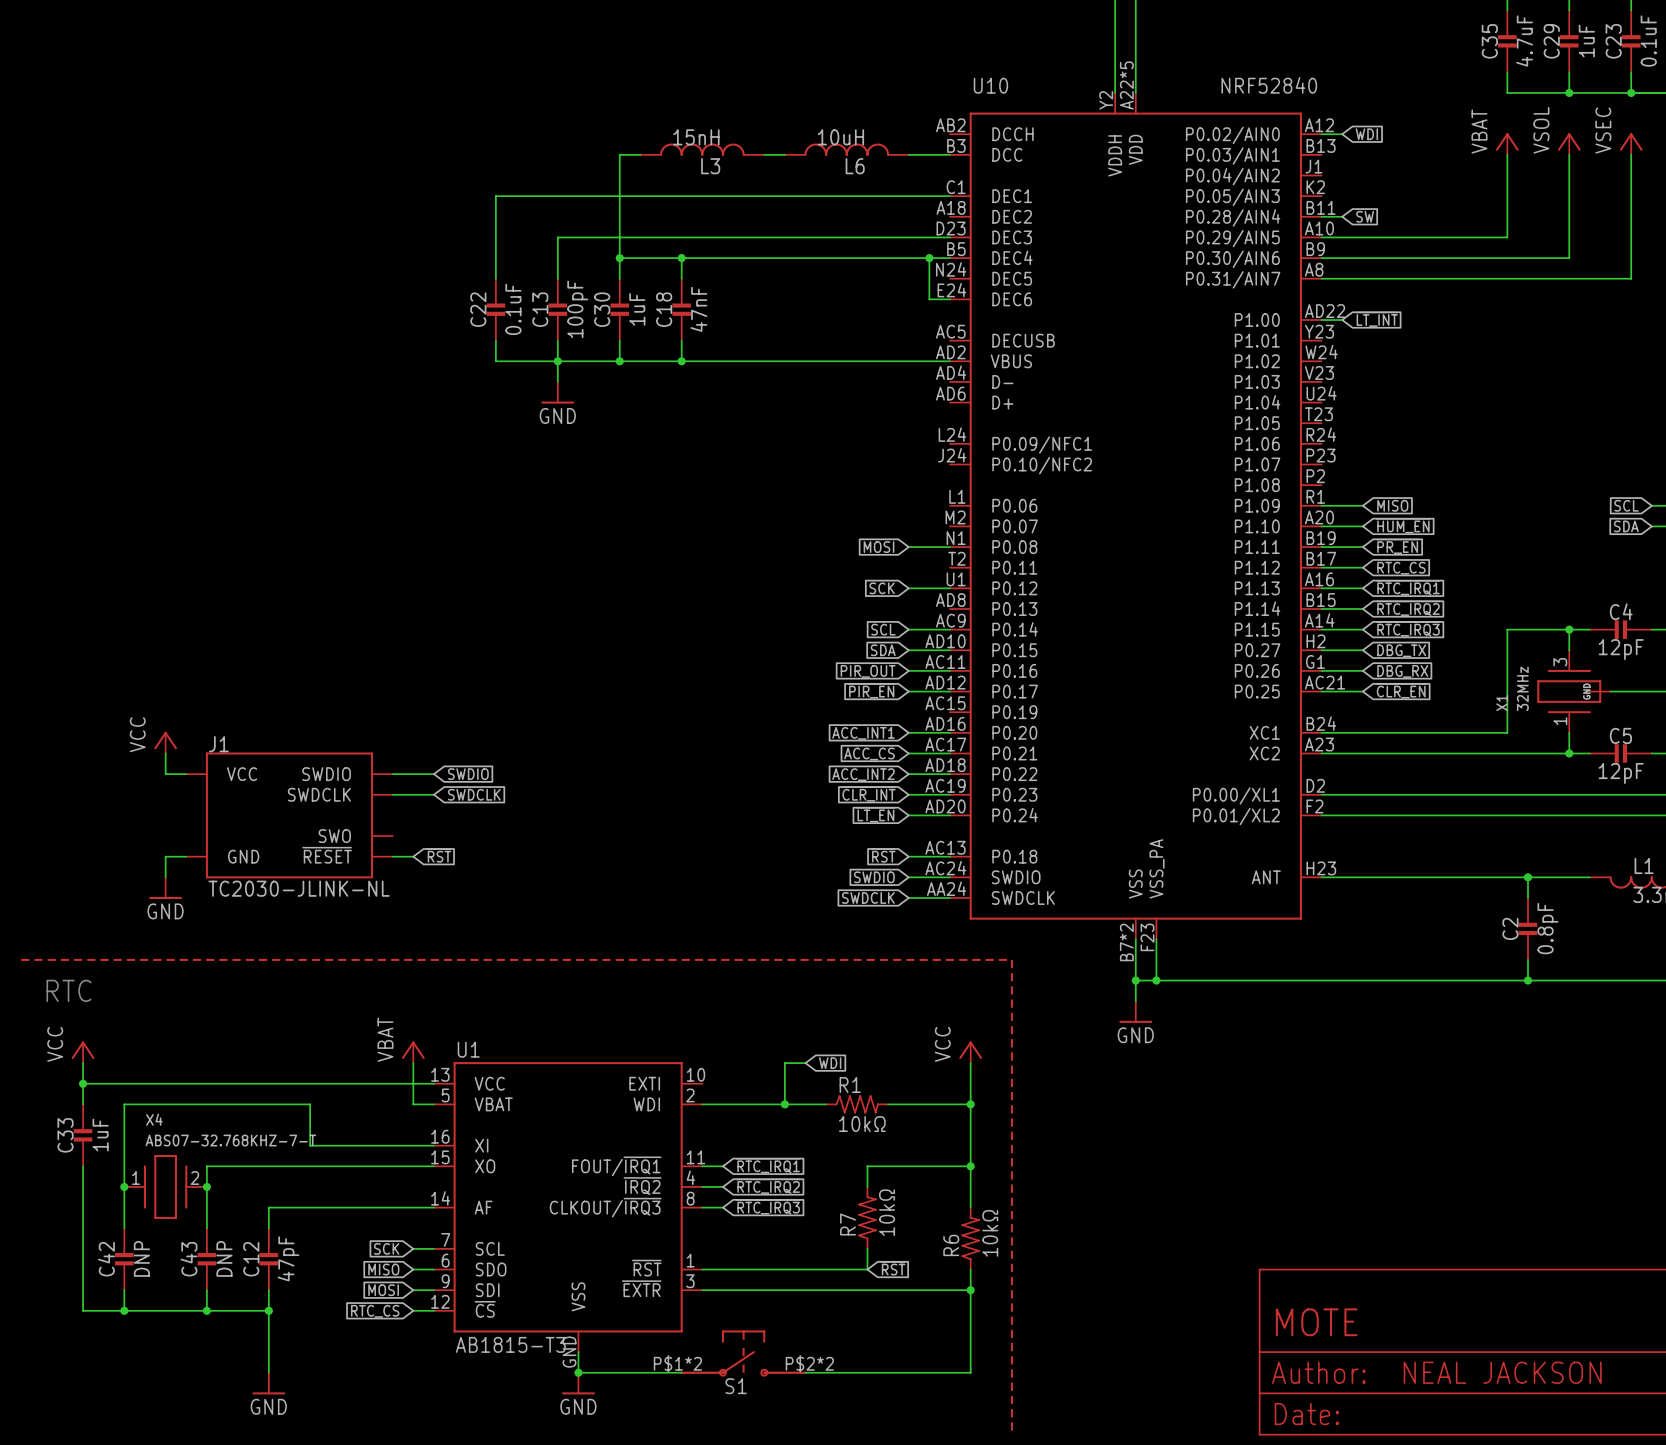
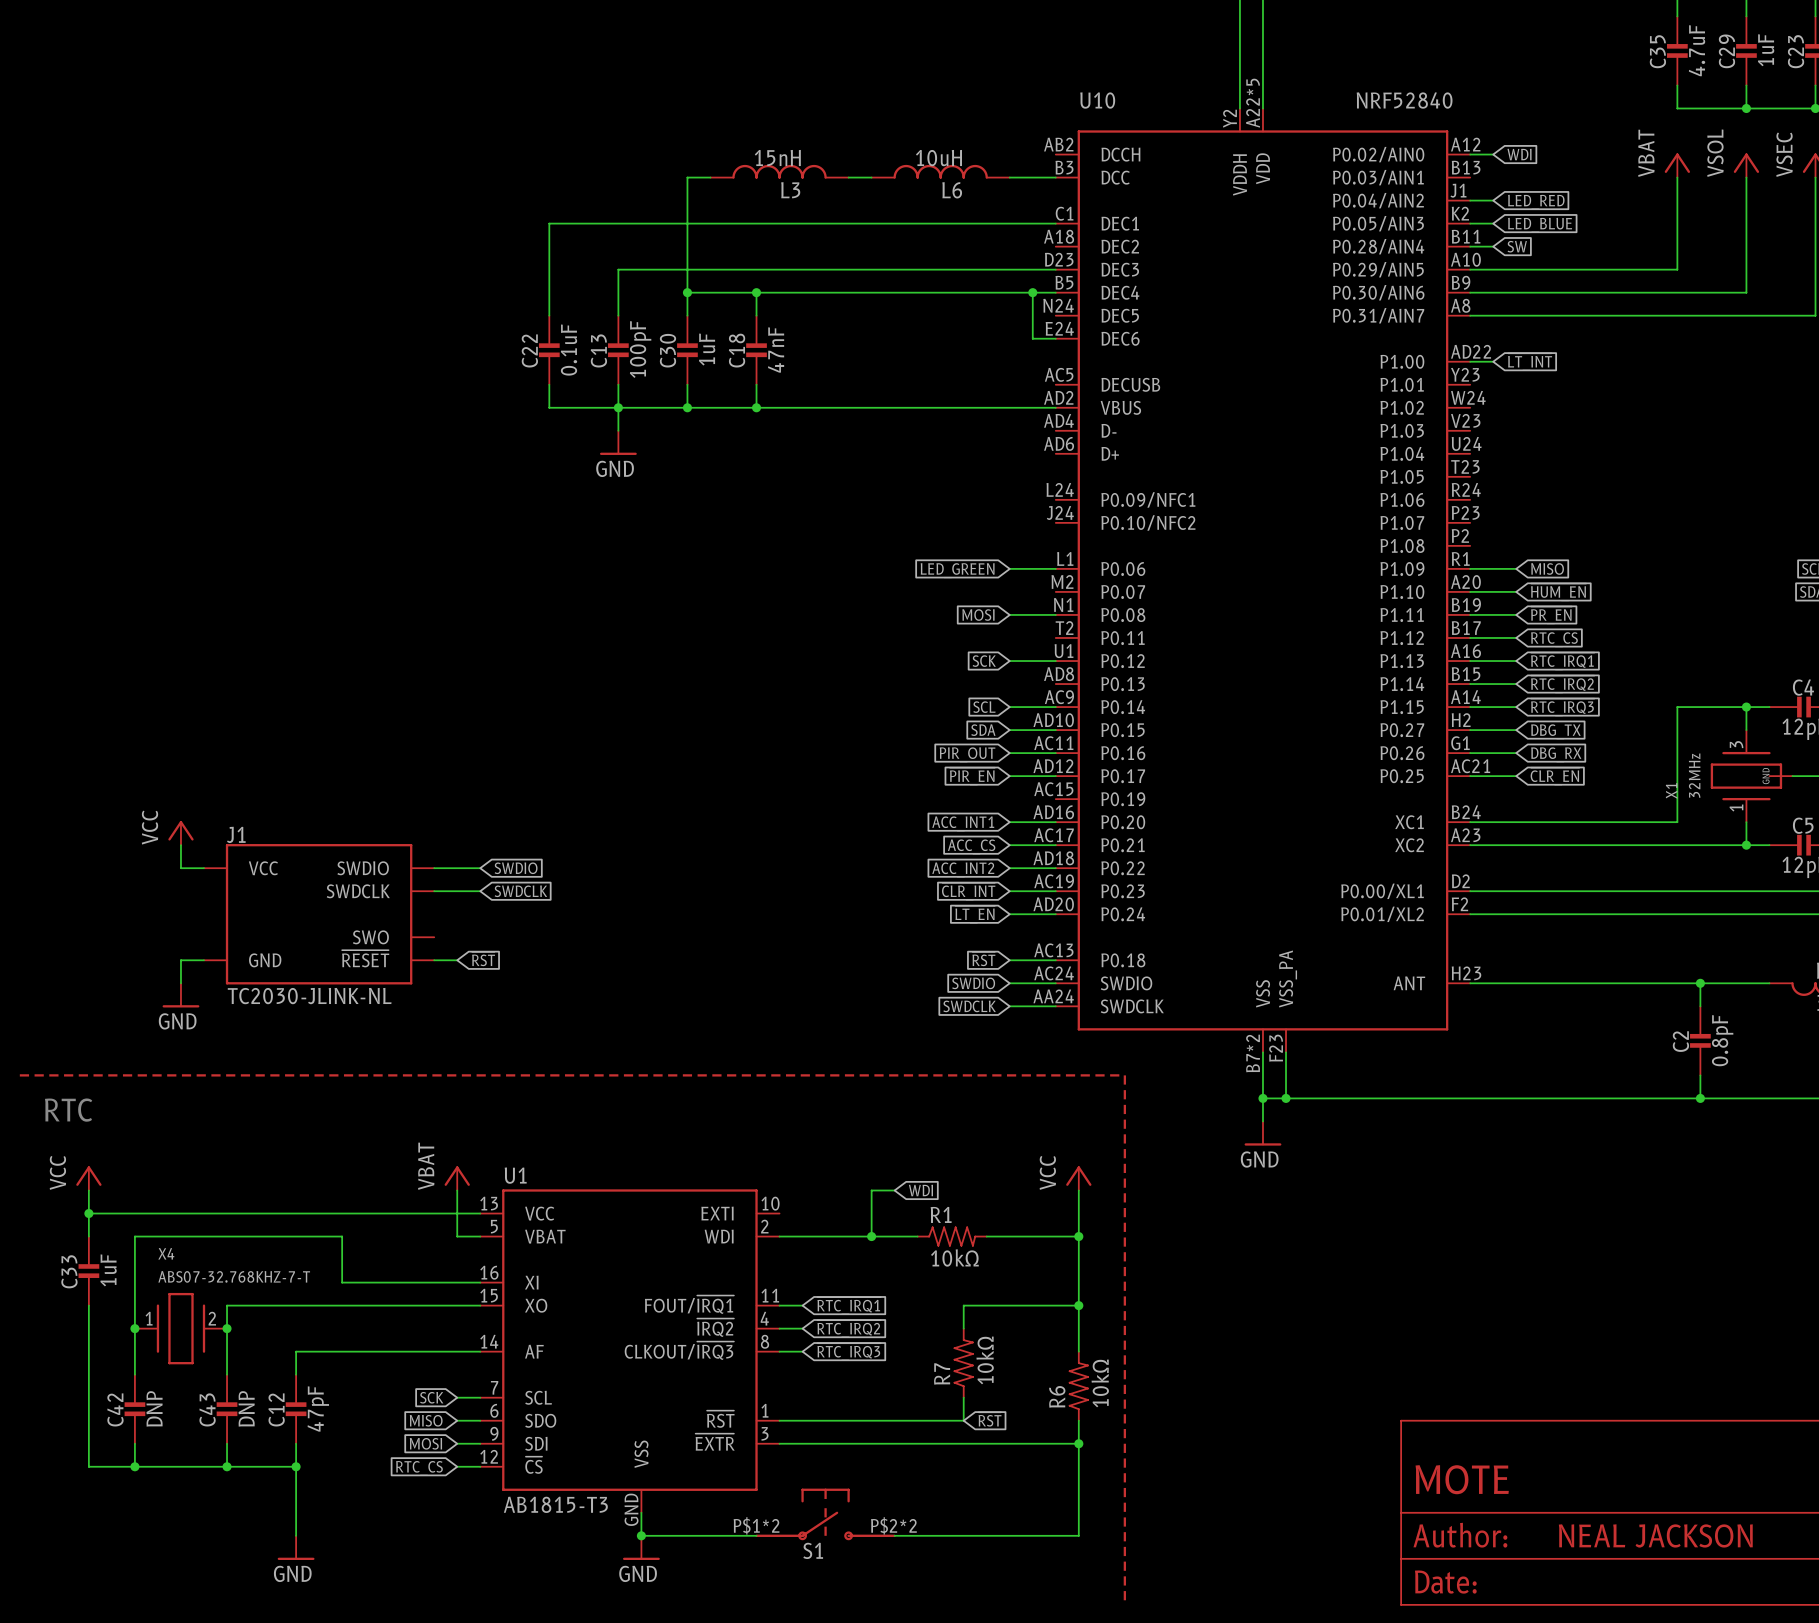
wire: none -> (1470, 200) (1493, 200)
global label: none -> LED_RED (1536, 202)
wire: none -> (1470, 223) (1493, 223)
global label: none -> LED_BLUE (1540, 225)
wire: none -> (1009, 568) (1055, 568)
global label: none -> LED_GREEN (957, 570)

